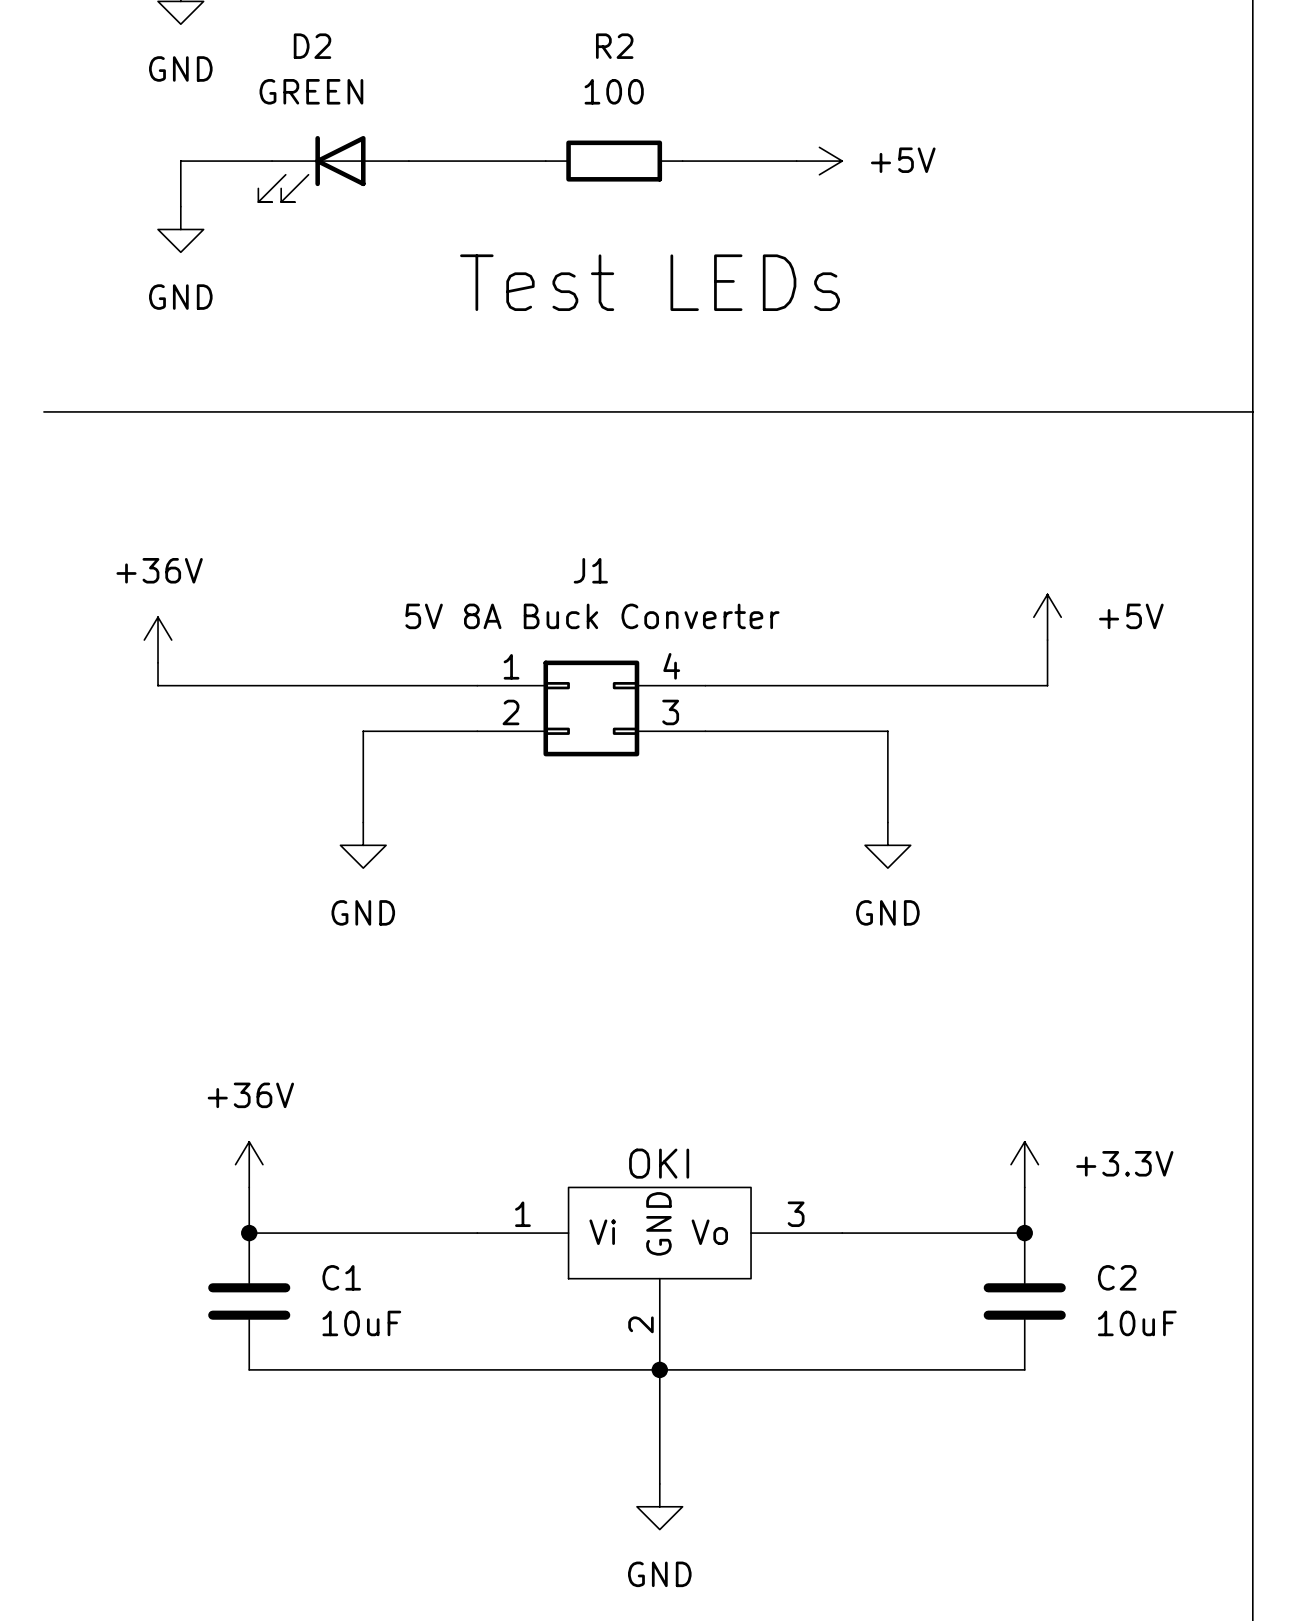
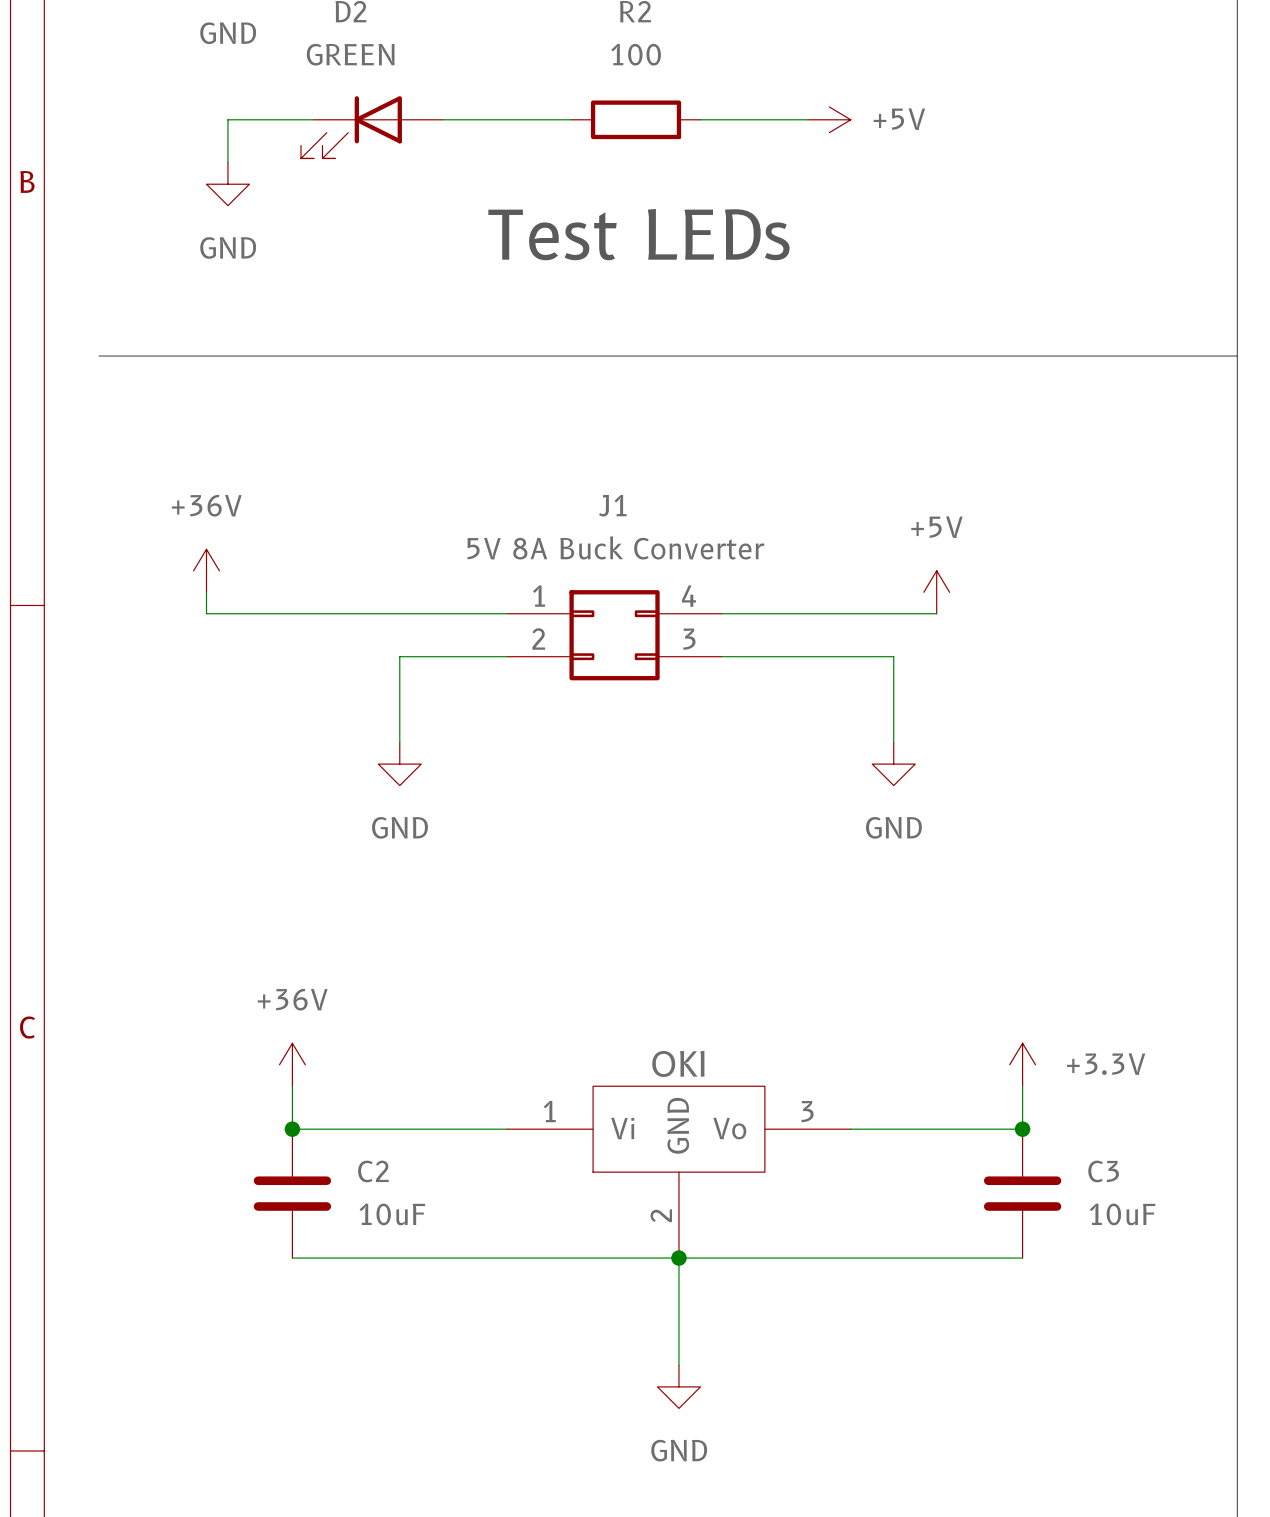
power symbol text position: +5V (1131, 616) -> +5V (936, 527)
power symbol position: +5V (1047, 617) -> +5V (936, 592)
wire: (1047, 640) (1047, 685) (933, 685) -> none
C1 name: C1 (341, 1277) -> C2 (373, 1171)
C2 name: C2 (1117, 1277) -> C3 (1103, 1171)

